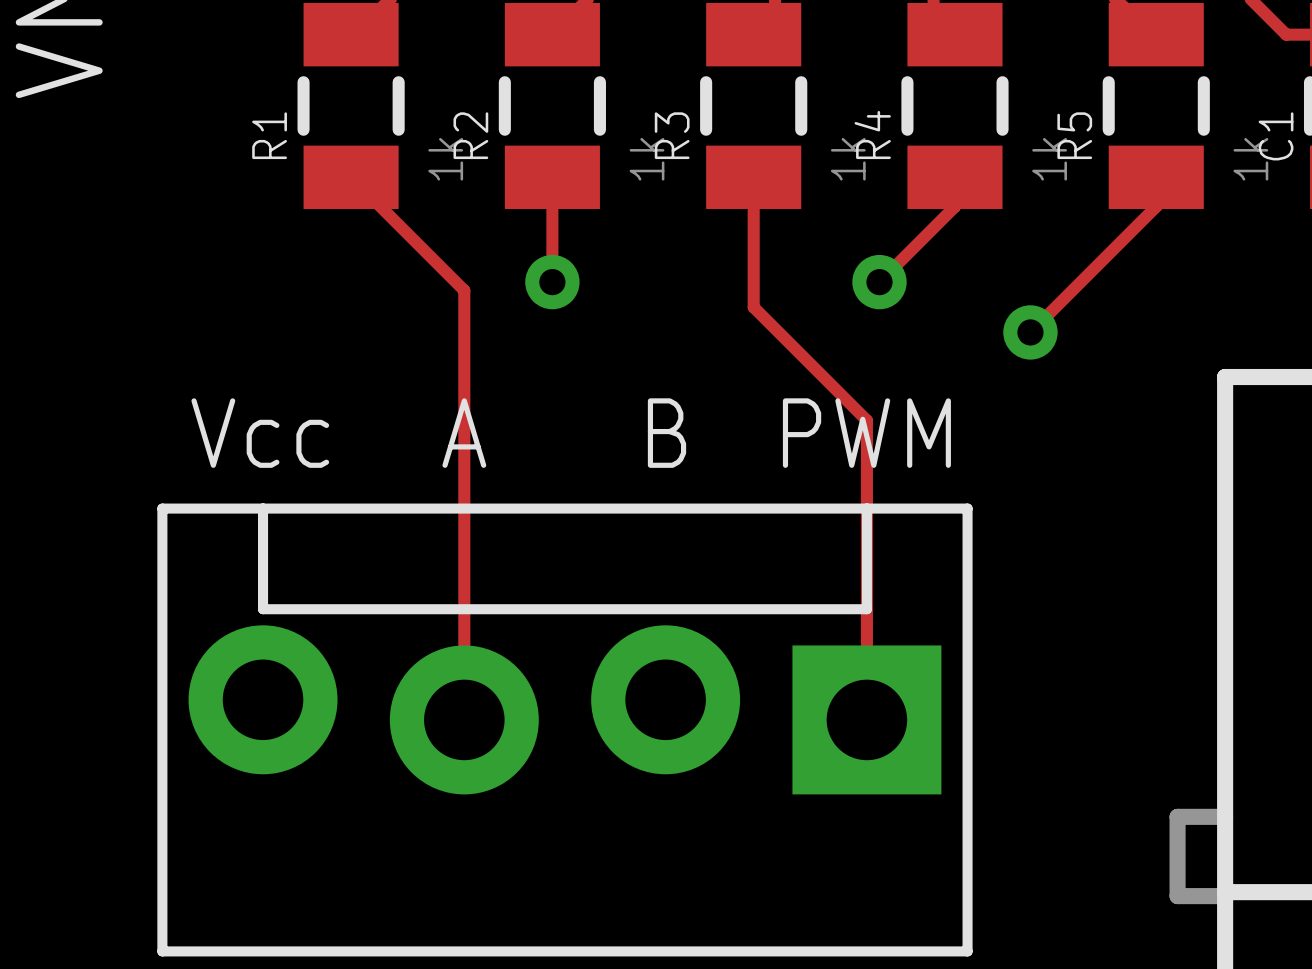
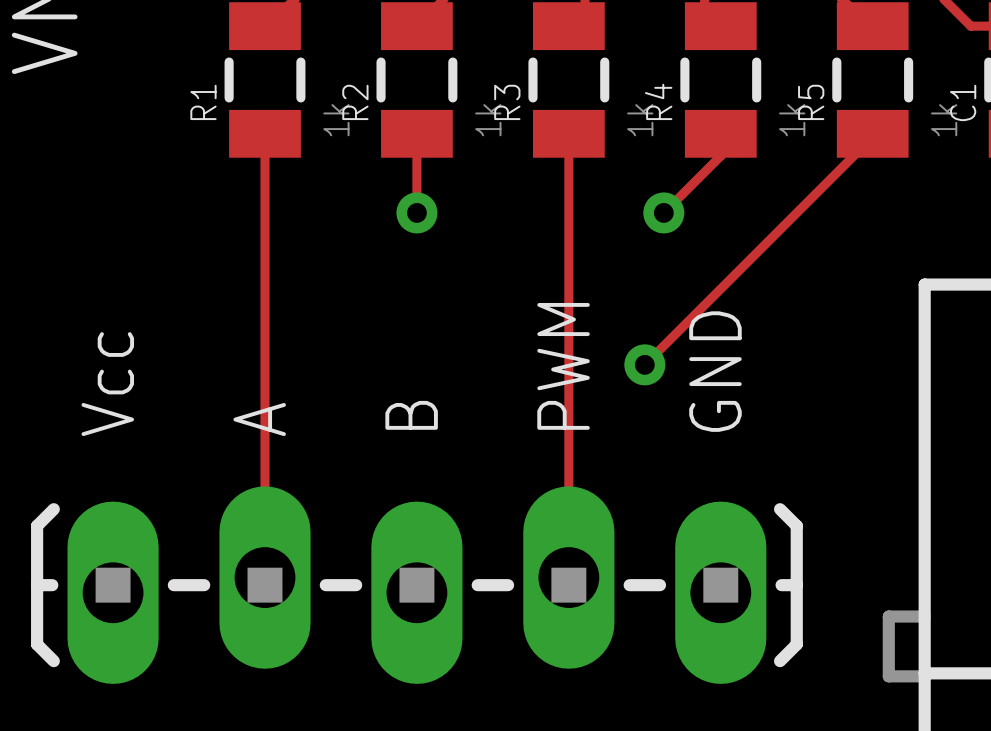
track: (351, 177) (464, 290) (464, 719) -> (265, 133) (265, 577)
track: (1156, 181) (1156, 206) (1030, 332) -> (872, 136) (644, 364)
track: (753, 307) (866, 420) (866, 719) -> (568, 231) (568, 577)
via position: (1030, 332) -> (644, 364)
text rotation: 0° (260, 433) -> 90° counterclockwise (107, 384)
text rotation: 0° (464, 433) -> 90° counterclockwise (259, 419)
text position: A (464, 433) -> A (259, 419)
text rotation: 0° (667, 433) -> 90° counterclockwise (411, 415)
text position: B (667, 433) -> B (411, 415)
text rotation: 0° (866, 433) -> 90° counterclockwise (563, 366)
text: none -> GND (715, 371)
part footprint: [157, 503, 973, 957] -> [31, 486, 803, 684]

